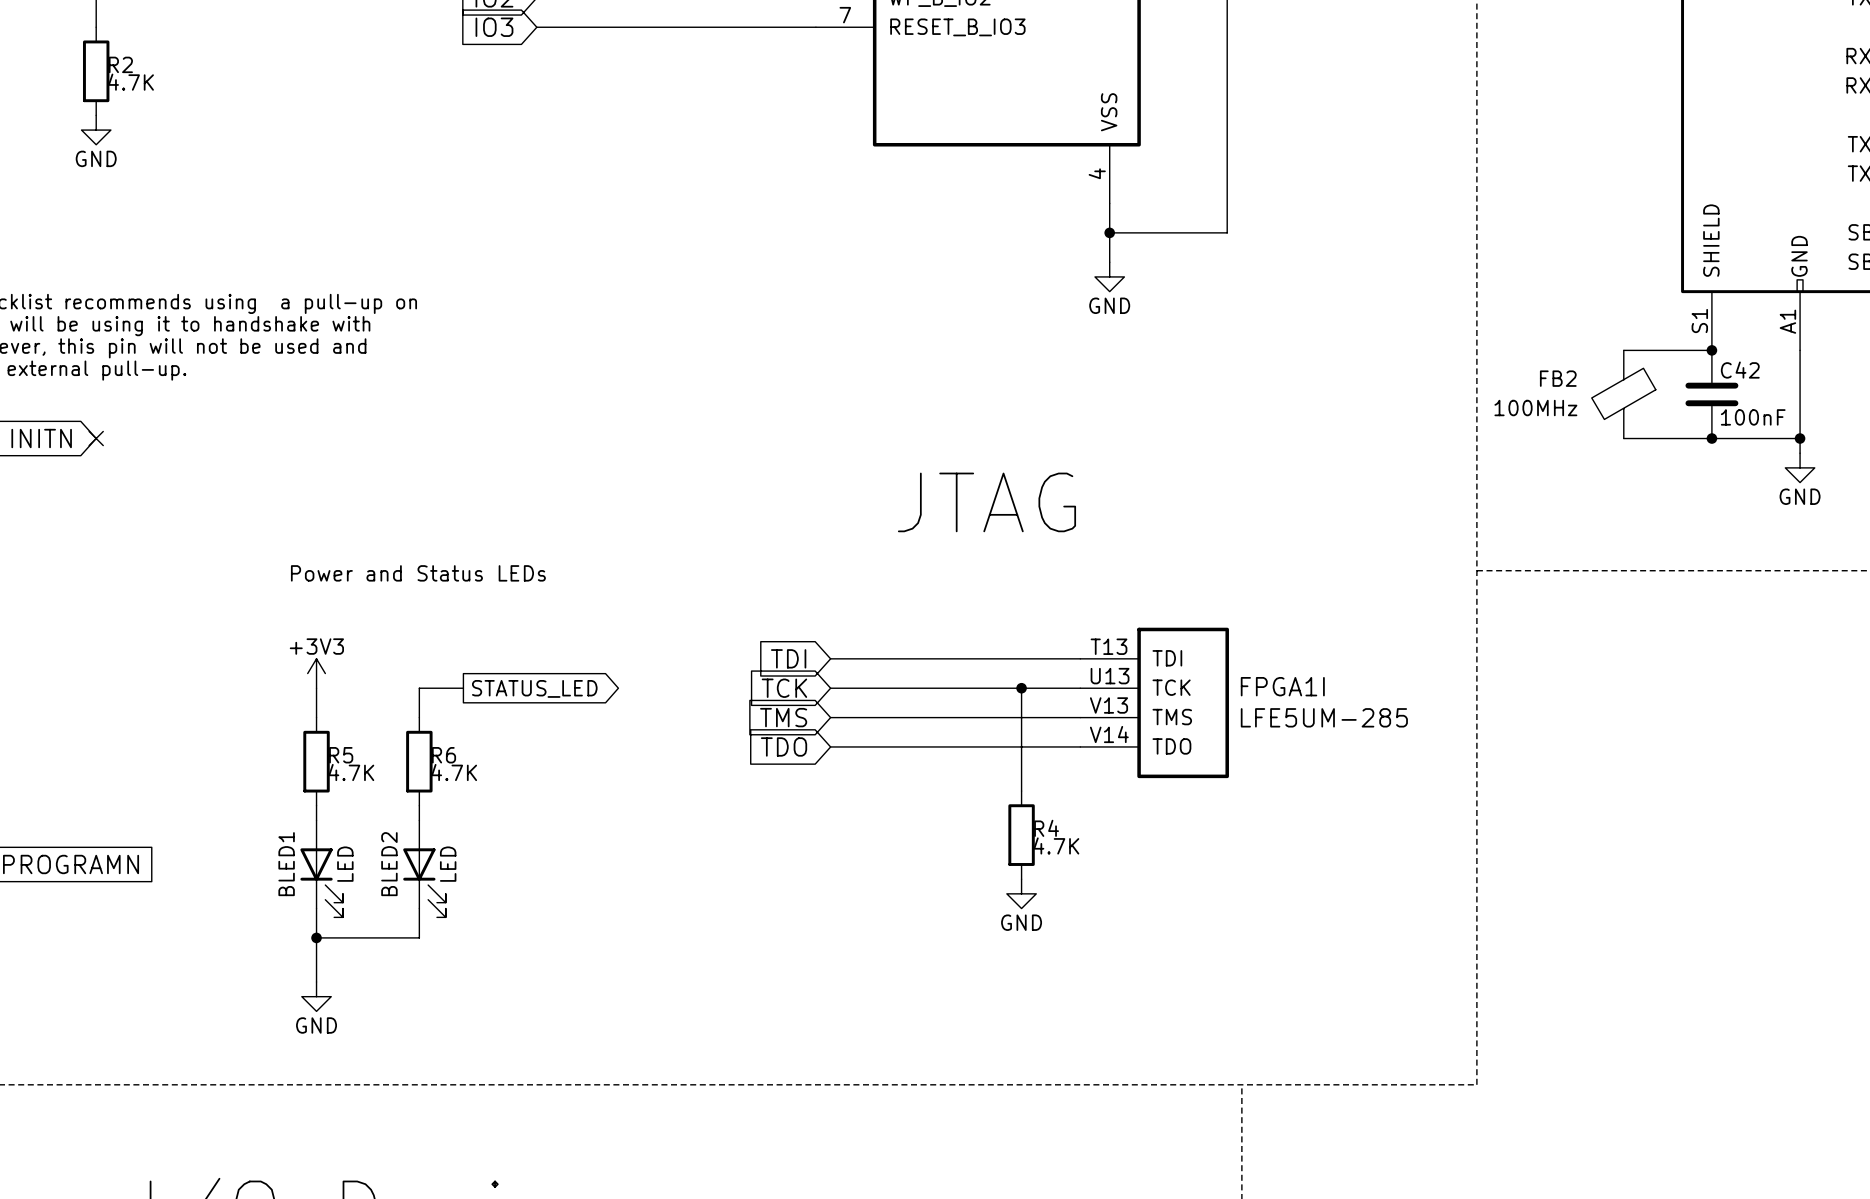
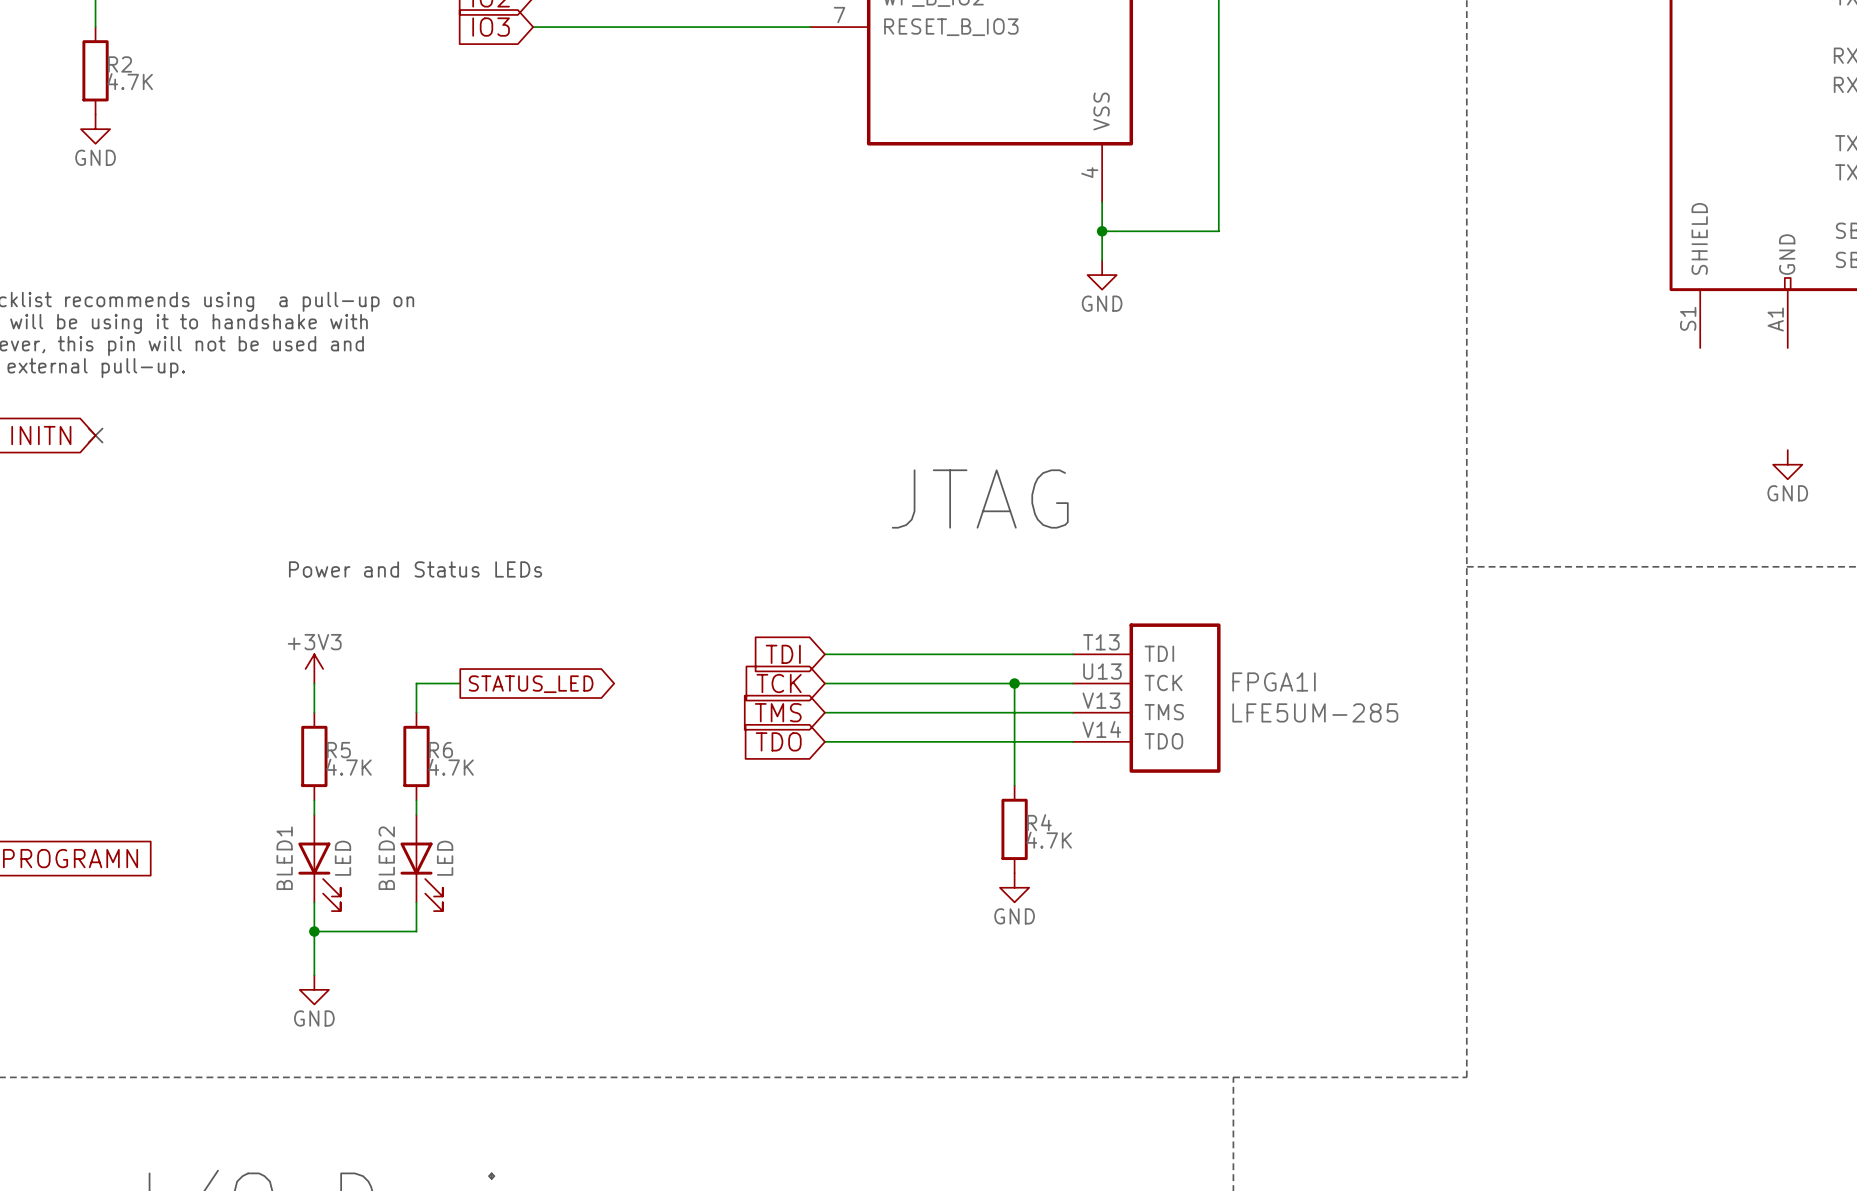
wire: (1623, 350) (1711, 350) -> none
junction: (1711, 350) -> none
wire: (1800, 350) (1800, 453) -> none
FB2: 100MHz (1623, 394) -> none
C42: 100nF (1711, 394) -> none
wire: (1623, 438) (1800, 438) -> none
junction: (1711, 438) -> none
junction: (1800, 438) -> none

